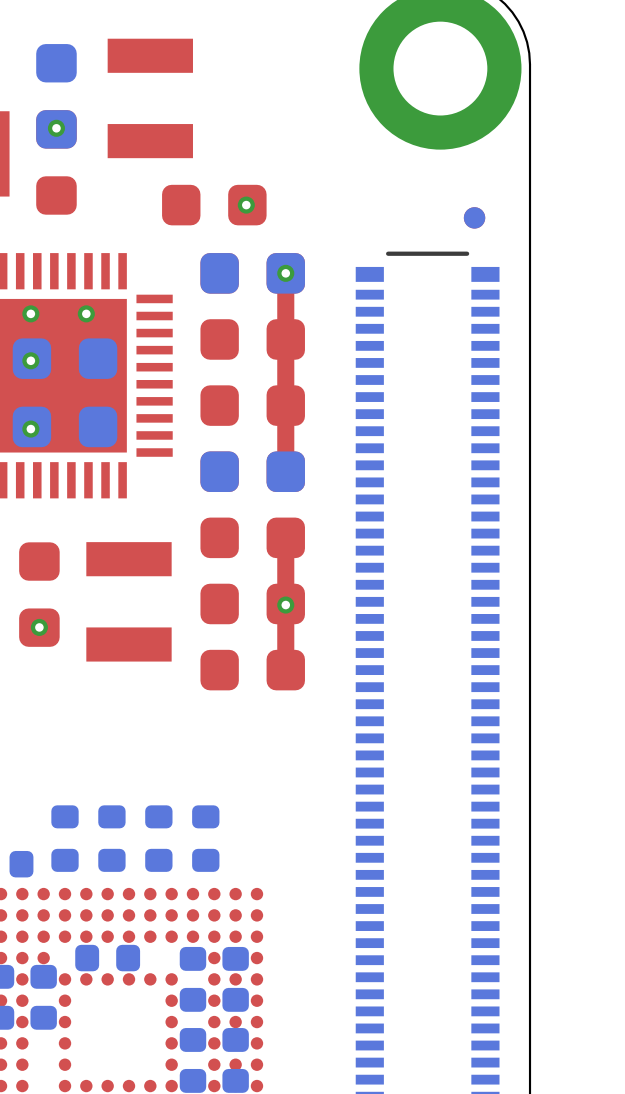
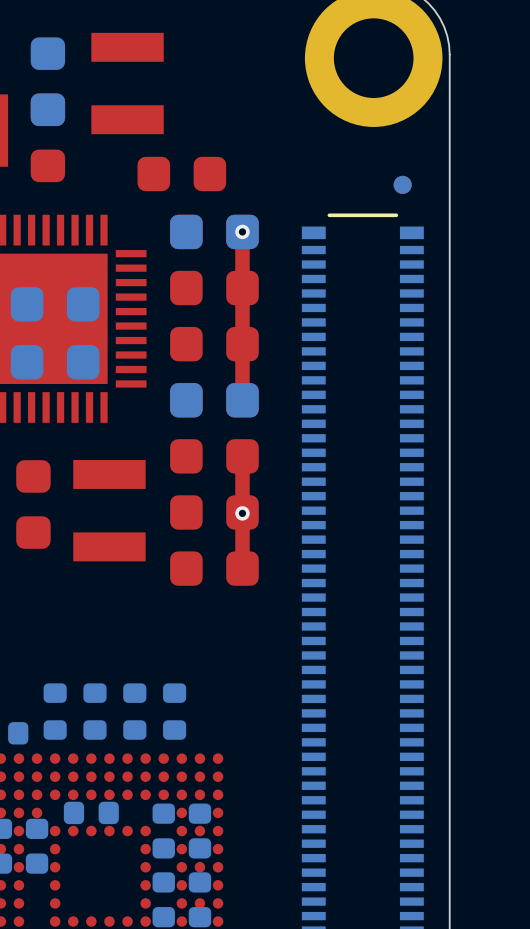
via: (56, 128) -> none
via: (246, 205) -> none
via: (30, 313) -> none
via: (86, 313) -> none
via: (30, 360) -> none
via: (30, 429) -> none
via: (39, 627) -> none

